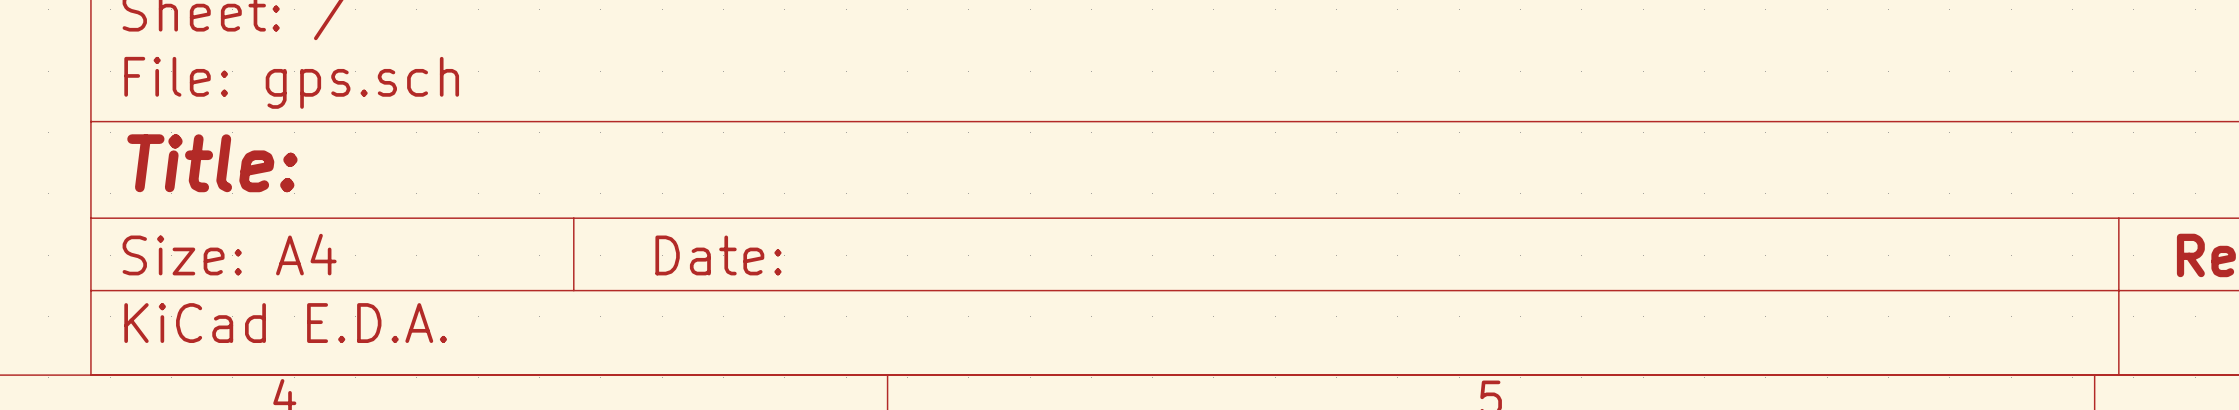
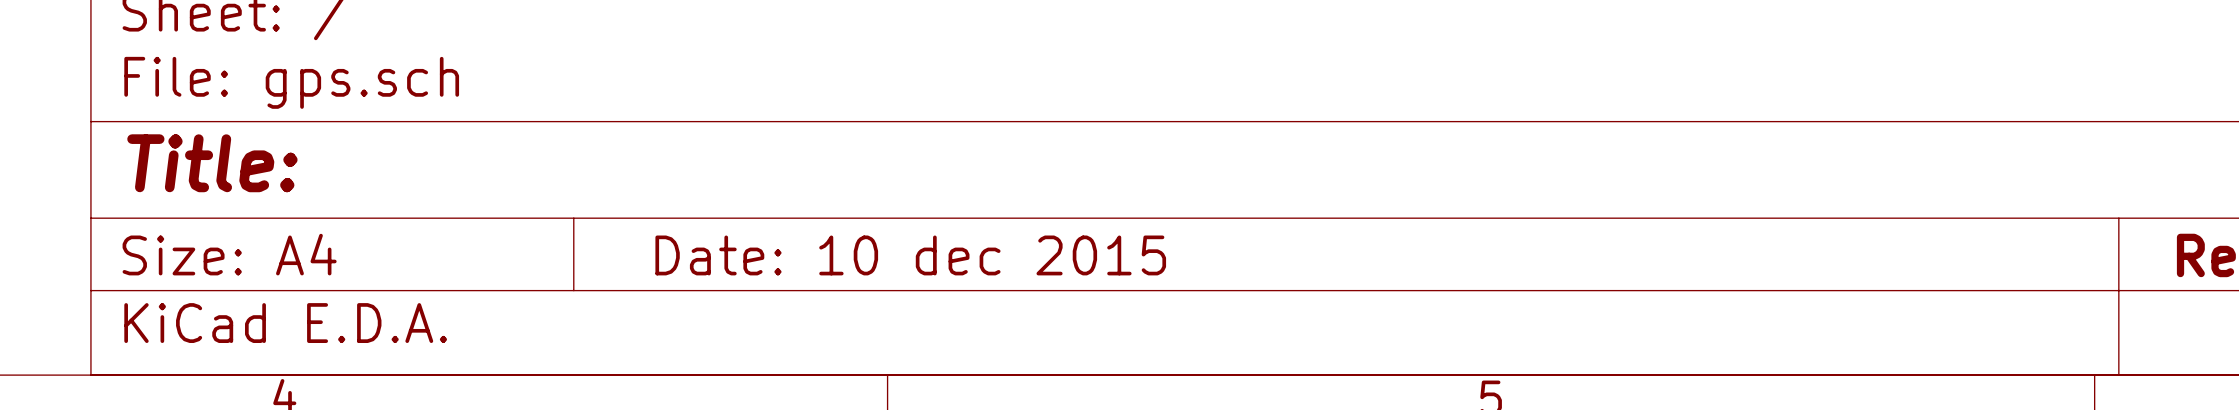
title block: Date: (718, 255) -> Date: 10 dec 2015 (910, 255)

